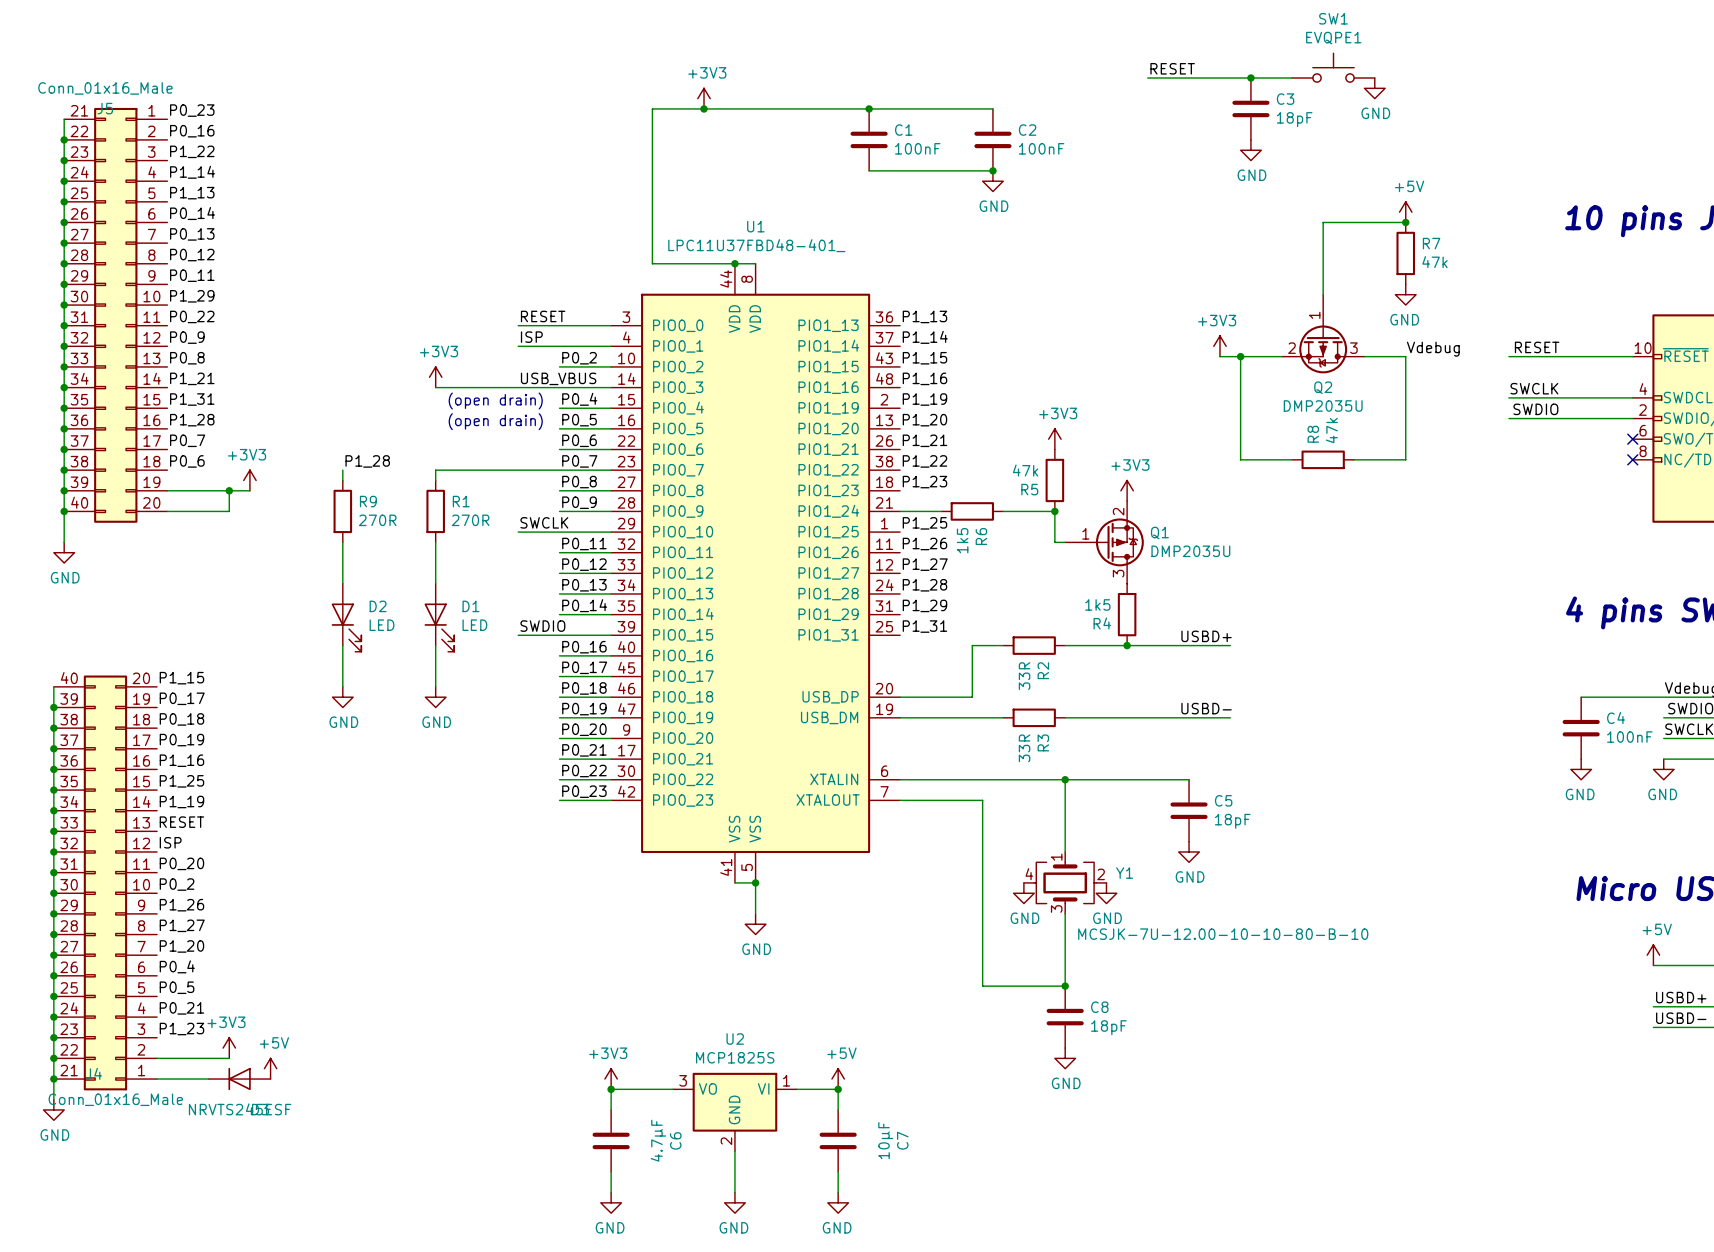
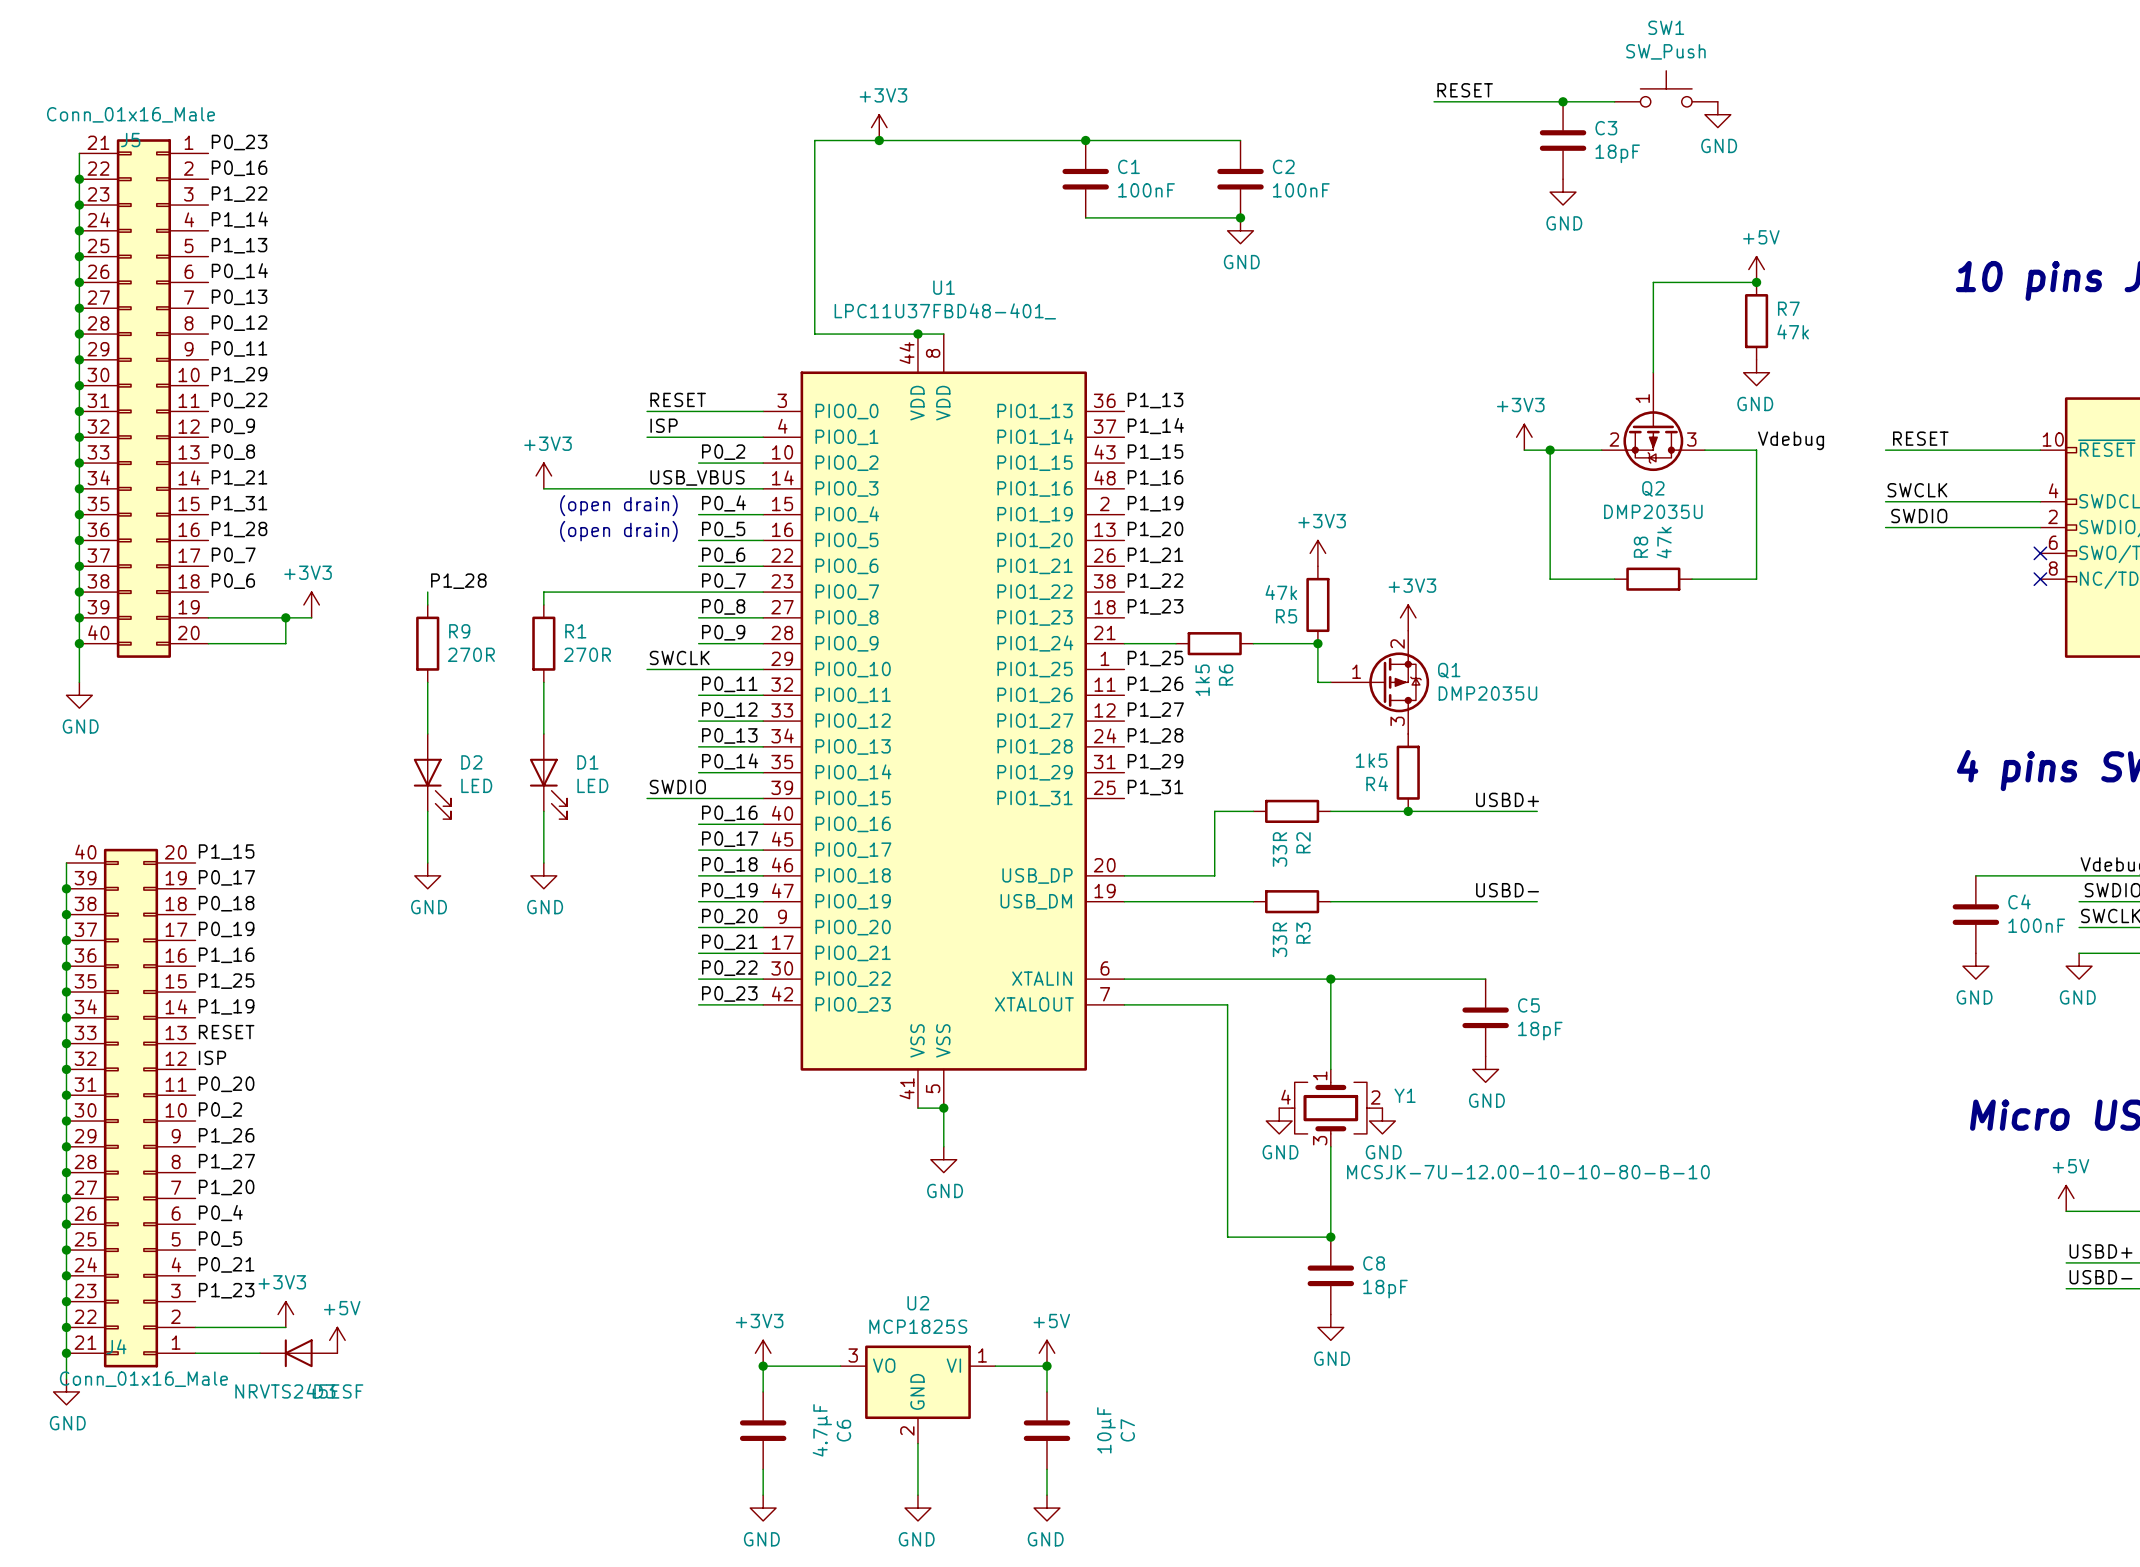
SW1 value: EVQPE1 (1333, 38) -> SW_Push (1665, 51)

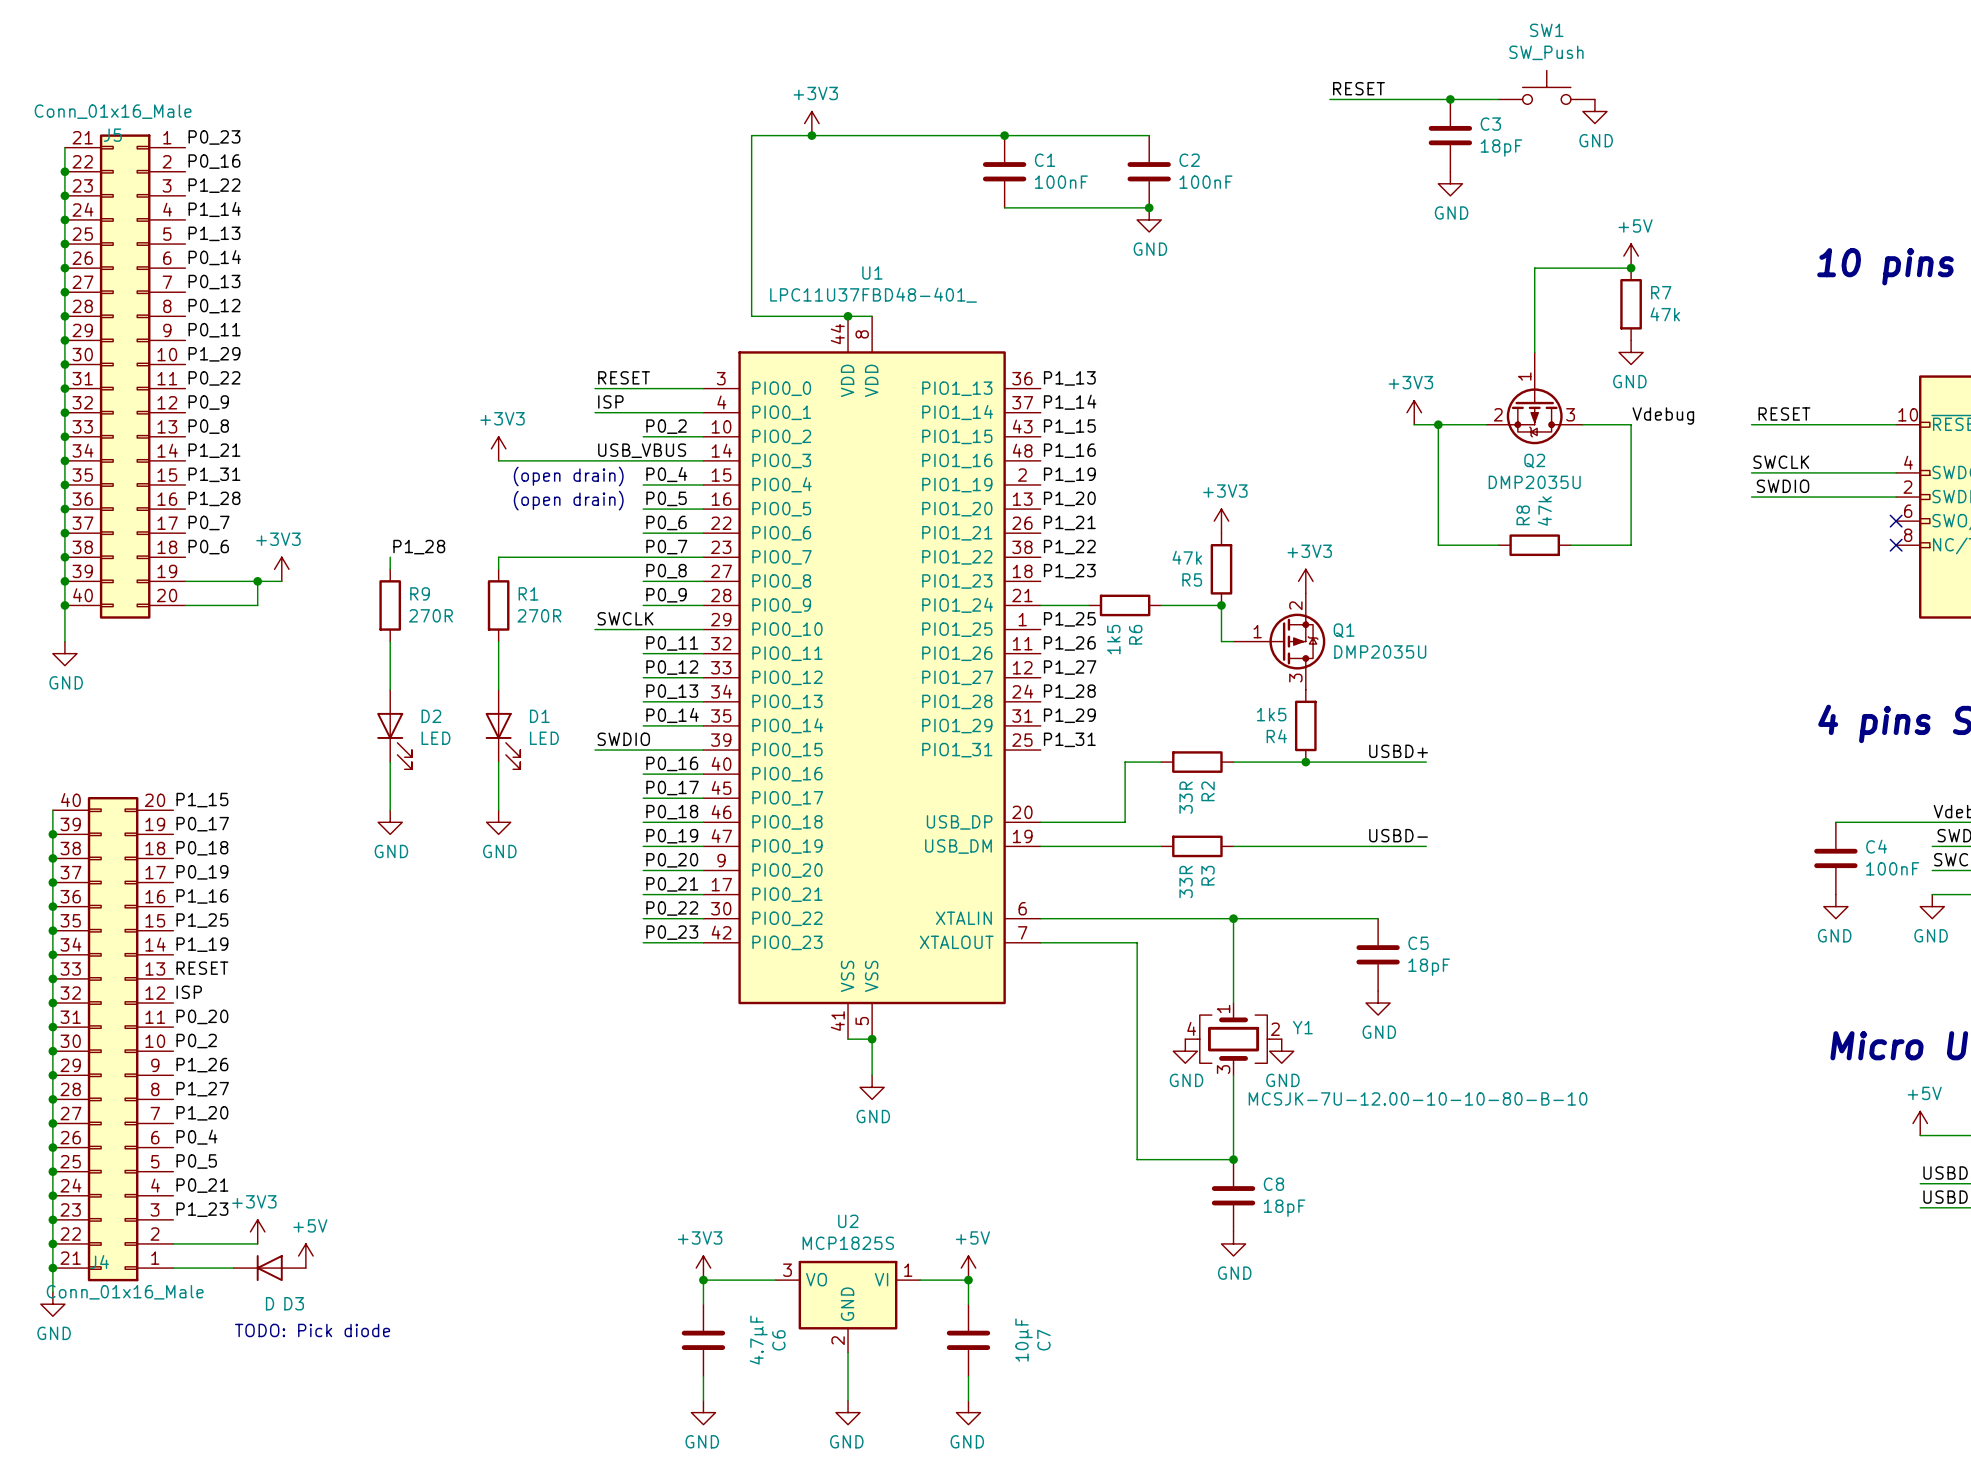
D3 value: NRVTS245ESF (299, 1391) -> D (270, 1303)
text: none -> TODO: Pick diode (312, 1330)

